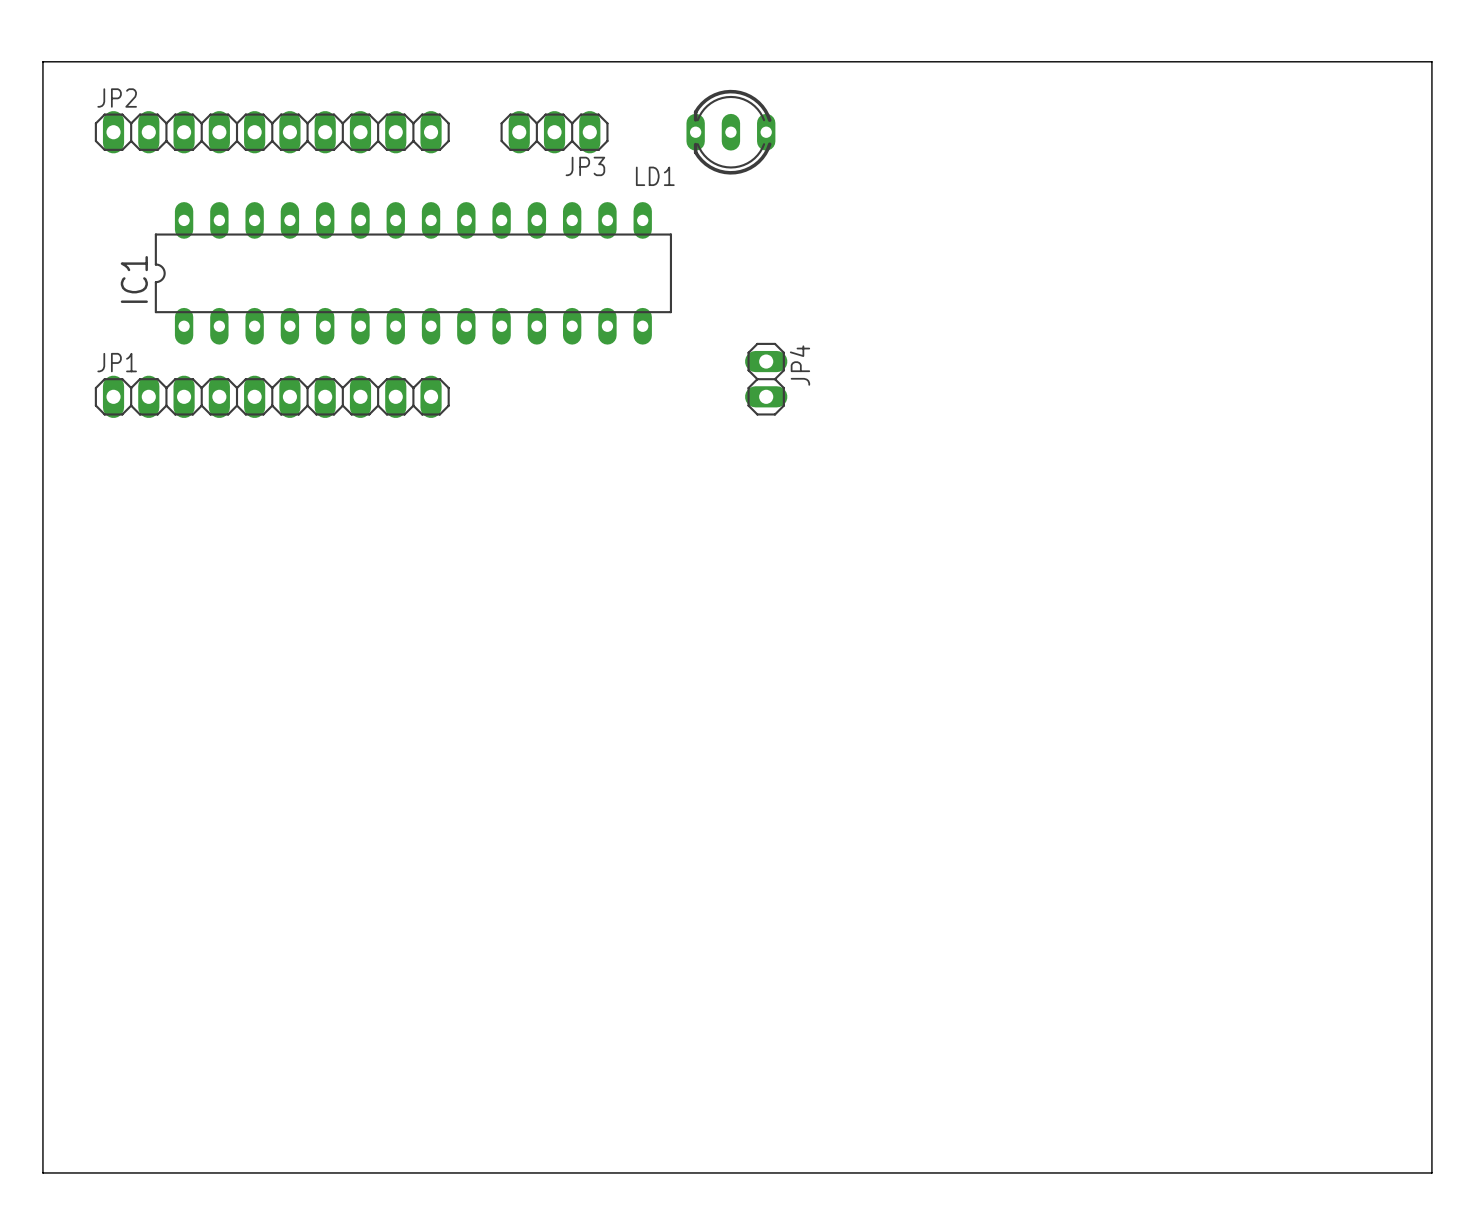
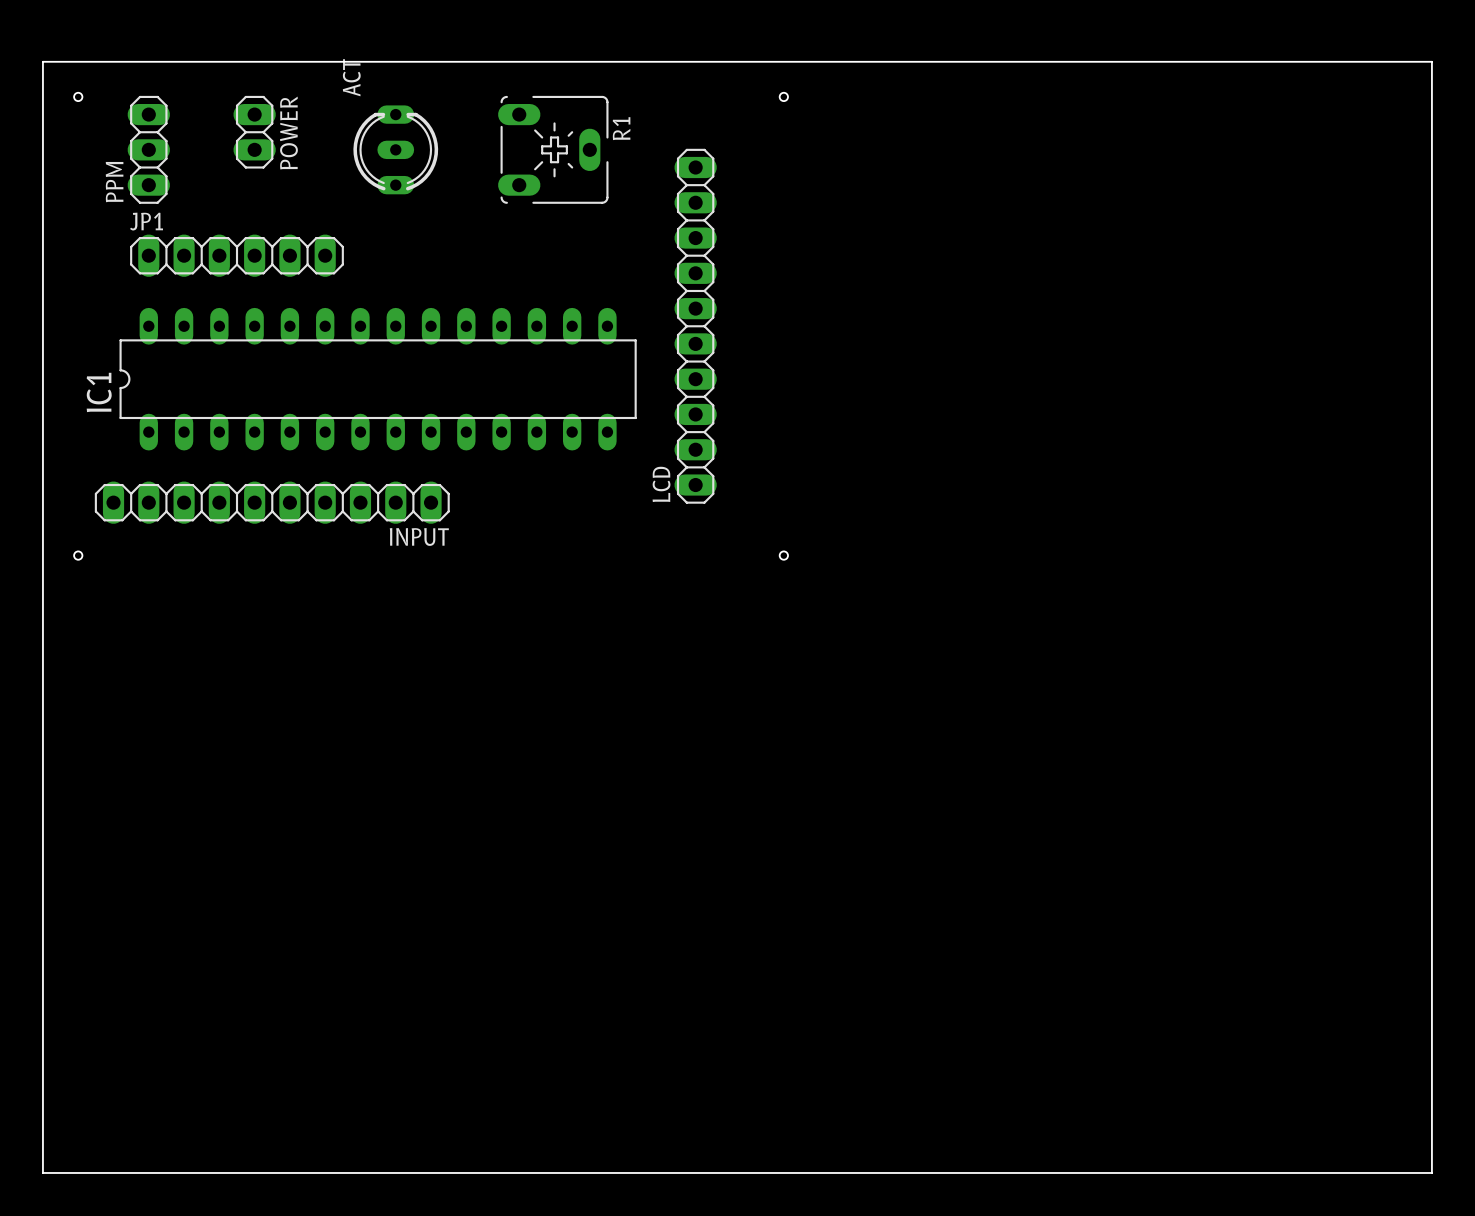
hole: none -> (78, 96)
hole: none -> (783, 96)
POWER: none -> (254, 132)
JP2: (272, 132) -> none
JP3: (554, 132) -> none
LD1: (730, 132) -> none
PPM: none -> (148, 149)
ACT: none -> (395, 149)
R1: none -> (553, 149)
IC1 position: (413, 273) -> (378, 379)
LCD: none -> (695, 326)
JP1 name position: JP1 (117, 362) -> JP1 (146, 221)
JP1 footprint: [94, 375, 450, 418] -> [130, 234, 344, 277]
JP4: (766, 379) -> none
INPUT: none -> (272, 502)
hole: none -> (78, 555)
hole: none -> (783, 555)

